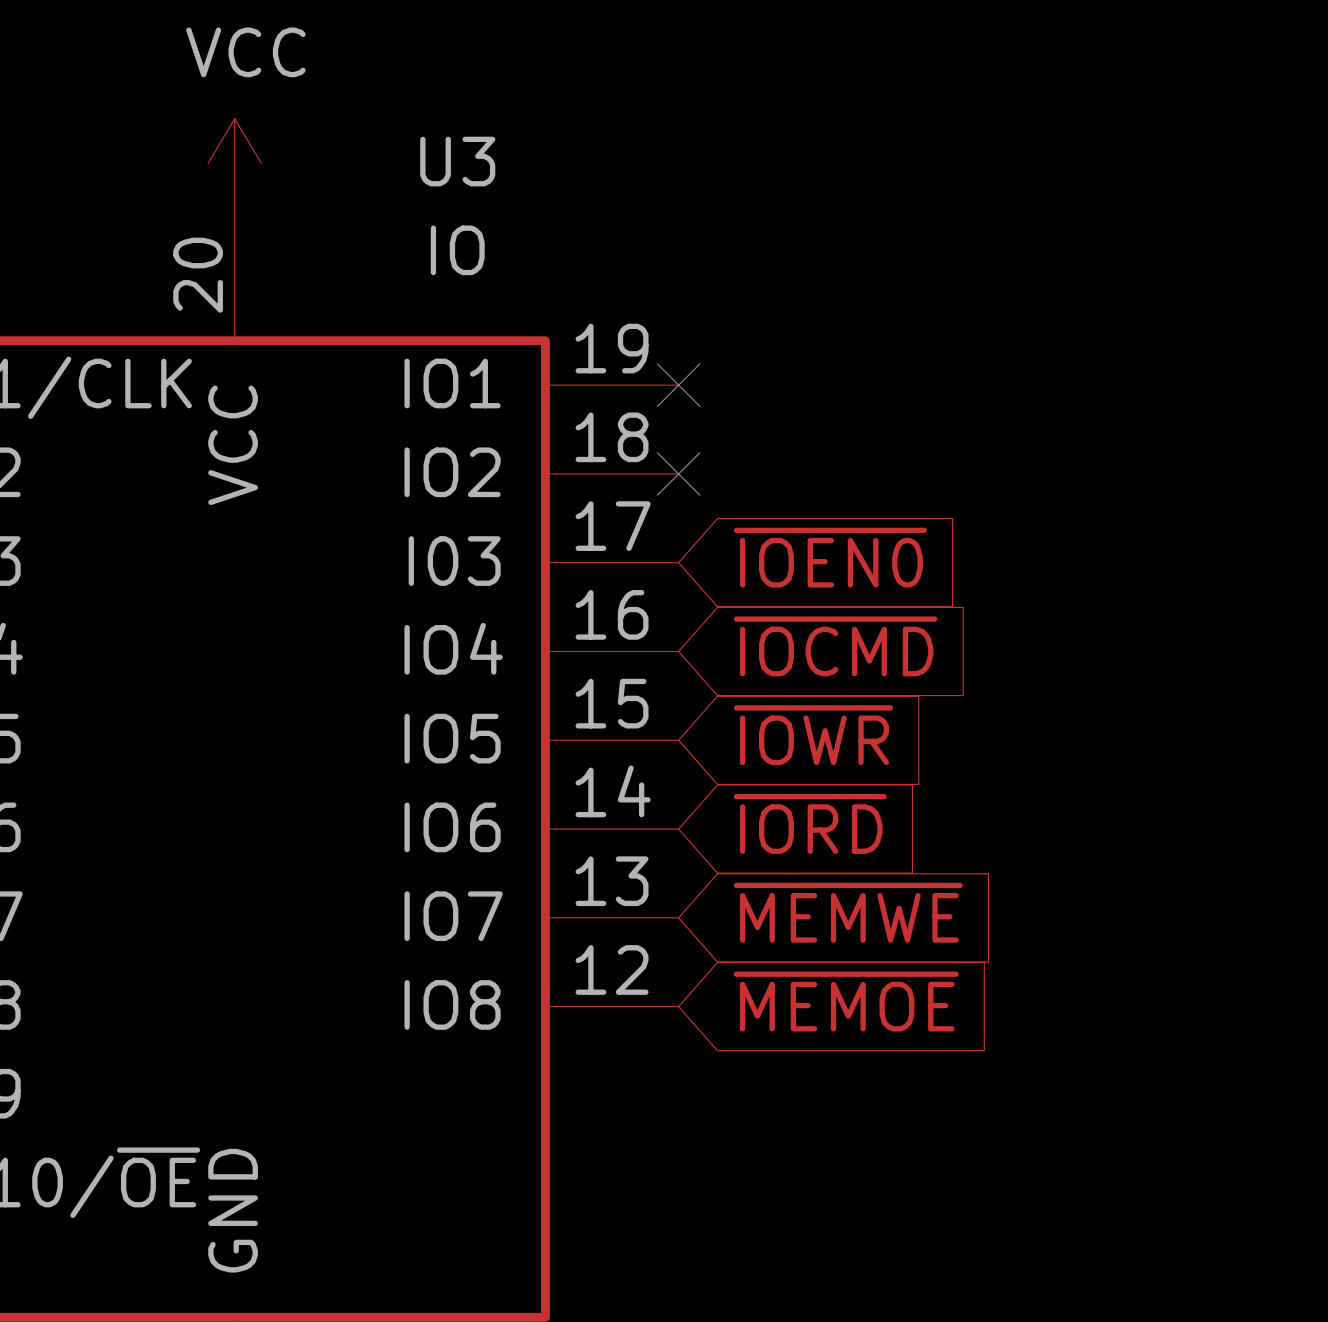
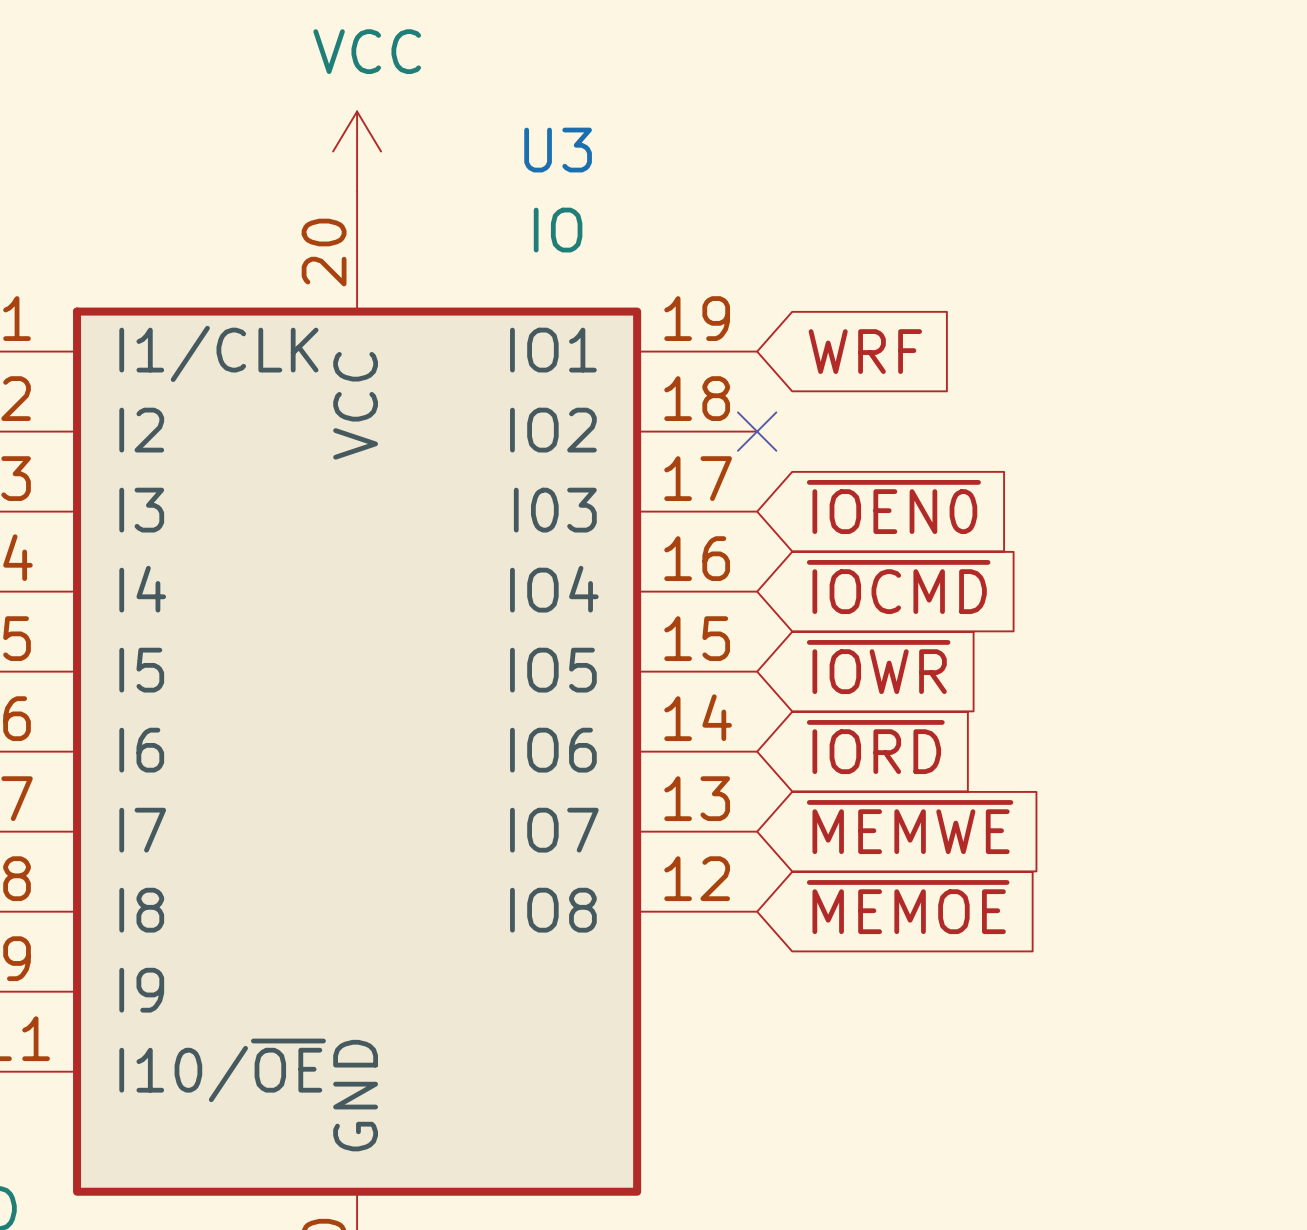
no-connect mark: (678, 385) -> none
global label: none -> WRF (865, 351)

